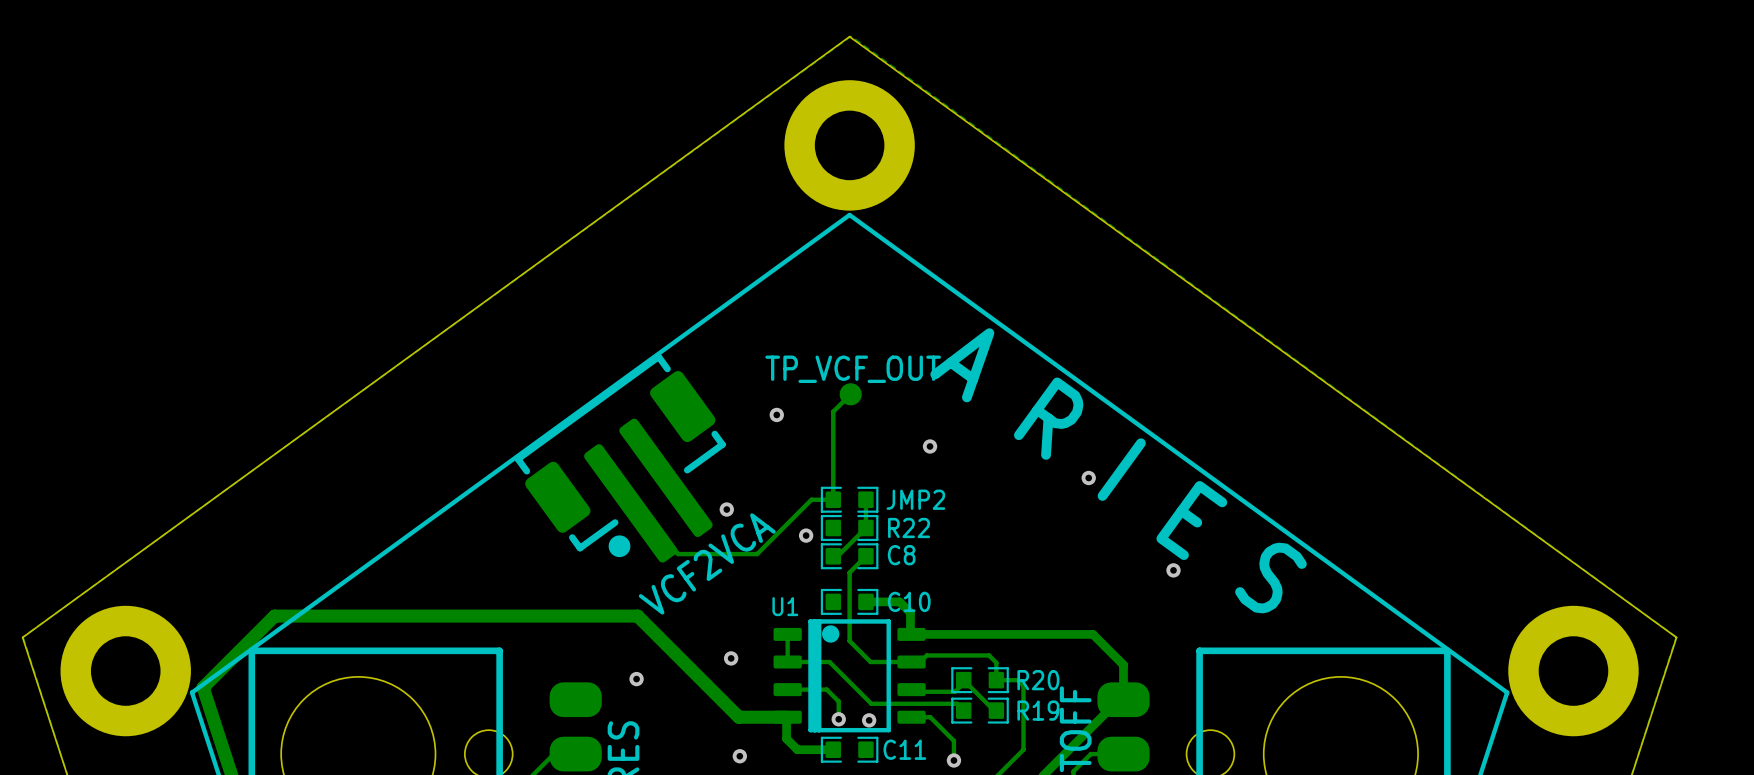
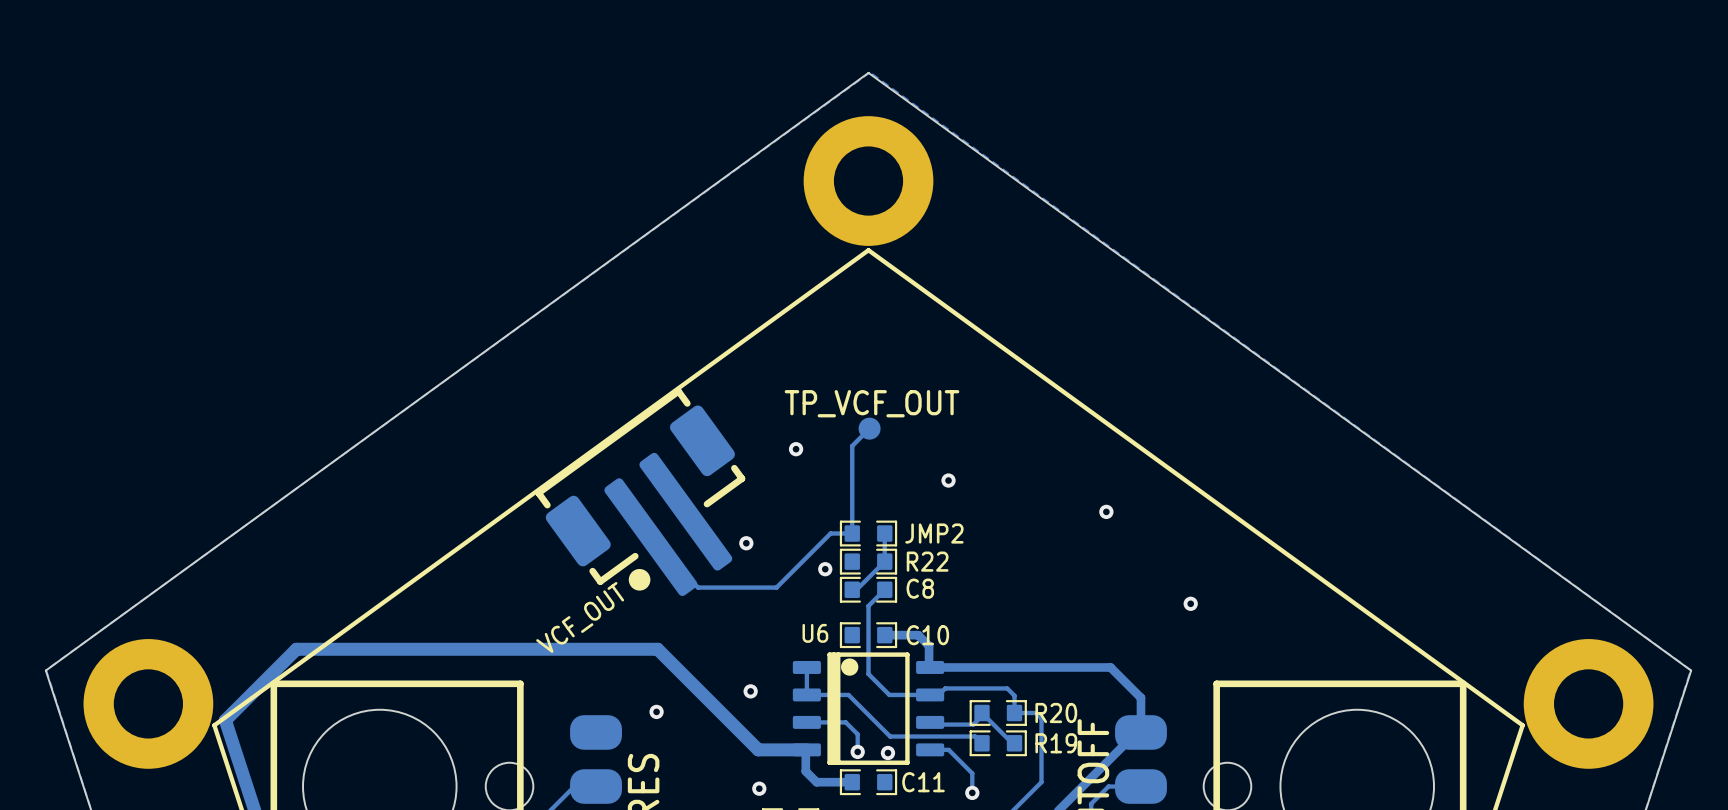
text: A R I E S (1118, 470) -> none
VCF2VCA name: VCF2VCA (707, 563) -> VCF_OUT (580, 617)
U1 name: U1 (785, 606) -> U6 (815, 633)

